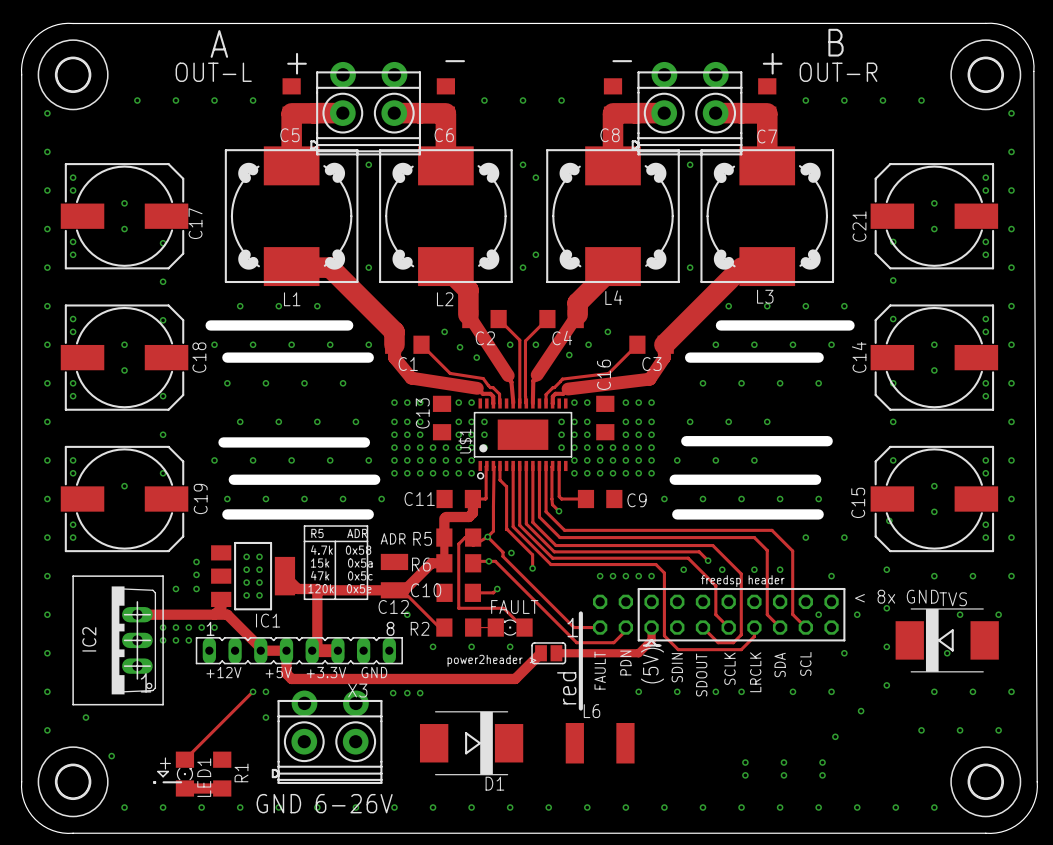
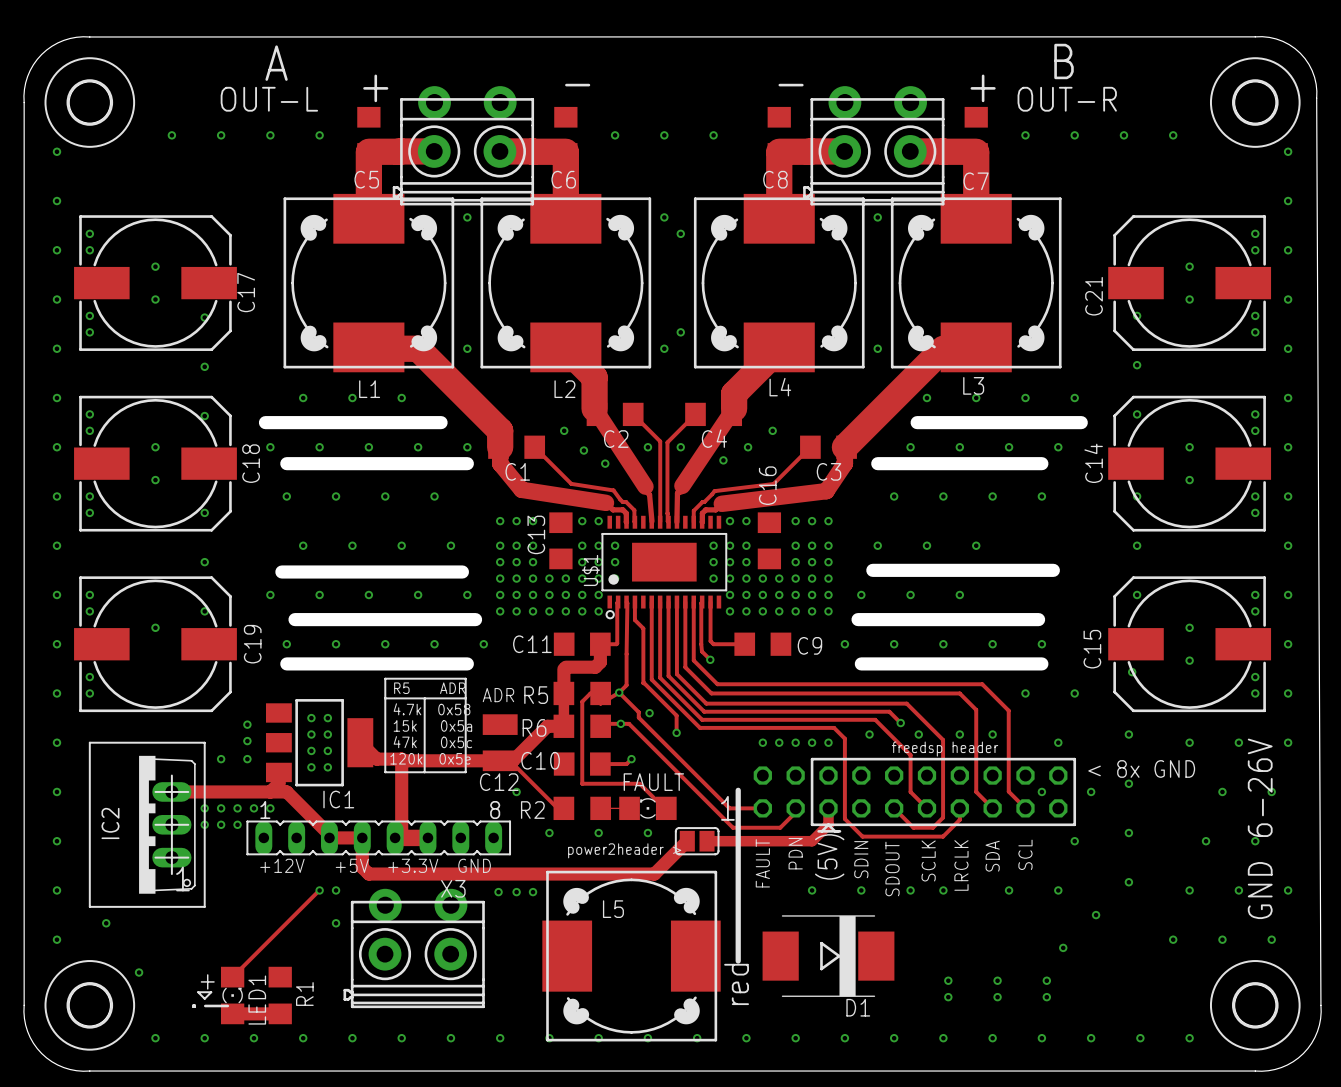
text: none -> 6-26V (1260, 787)
TVS: (947, 640) -> none
via: none -> (1255, 841)
text position: red (566, 688) -> red (736, 984)
text: none -> GND (1260, 890)
line: none -> (738, 911) (738, 961)
D1 position: (471, 743) -> (828, 956)
L5: none -> (631, 956)
L6: (600, 743) -> none
text: GND (278, 803) -> none
text: 6-26V (354, 803) -> none

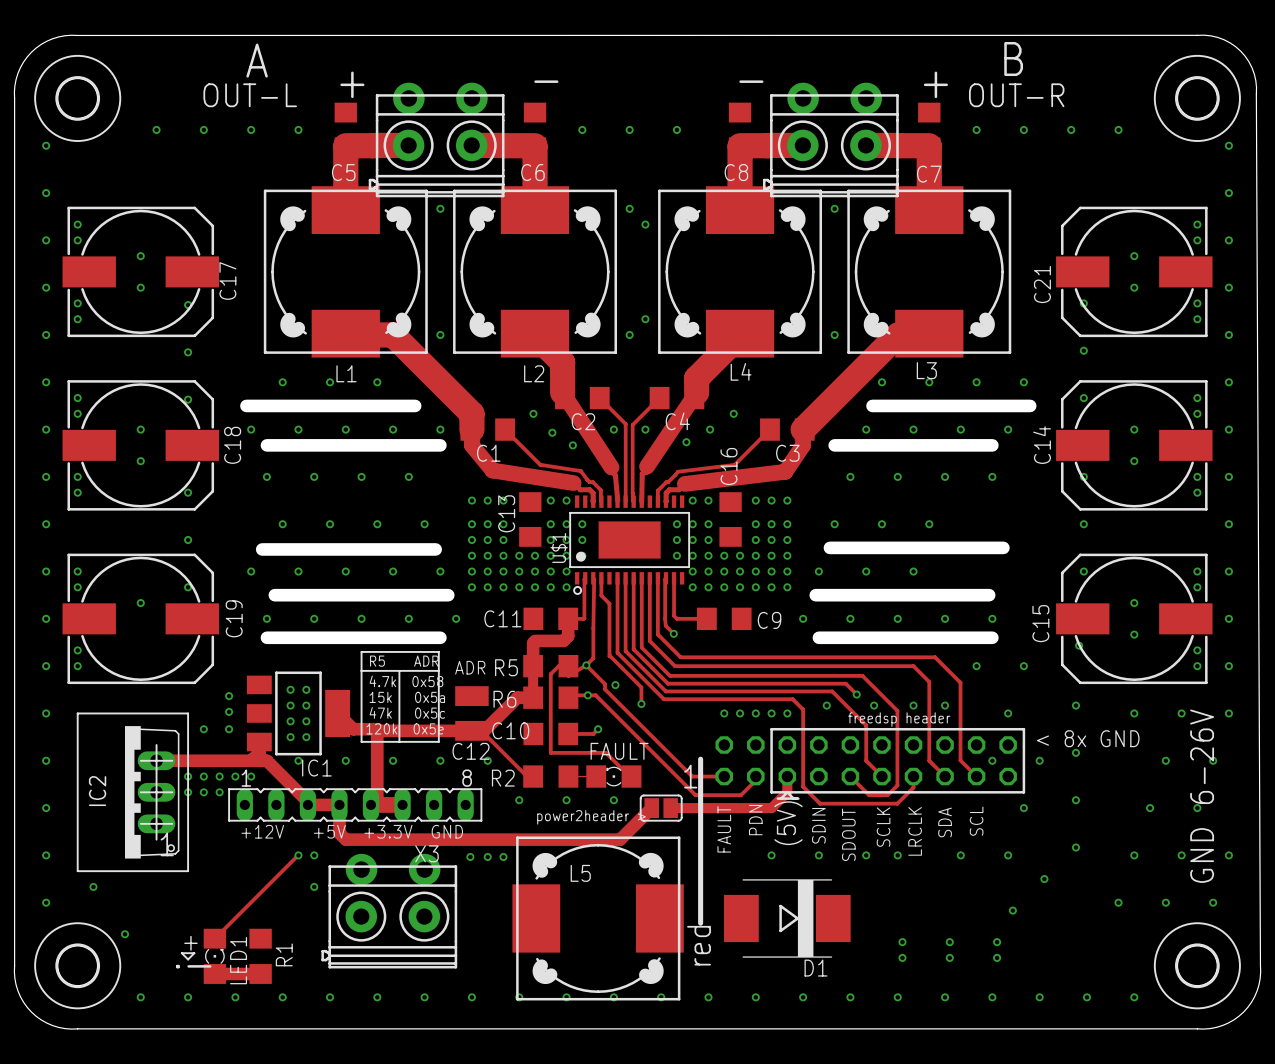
via: none -> (298, 760)
via: none -> (345, 760)
via: none -> (393, 760)
via: none -> (440, 760)

